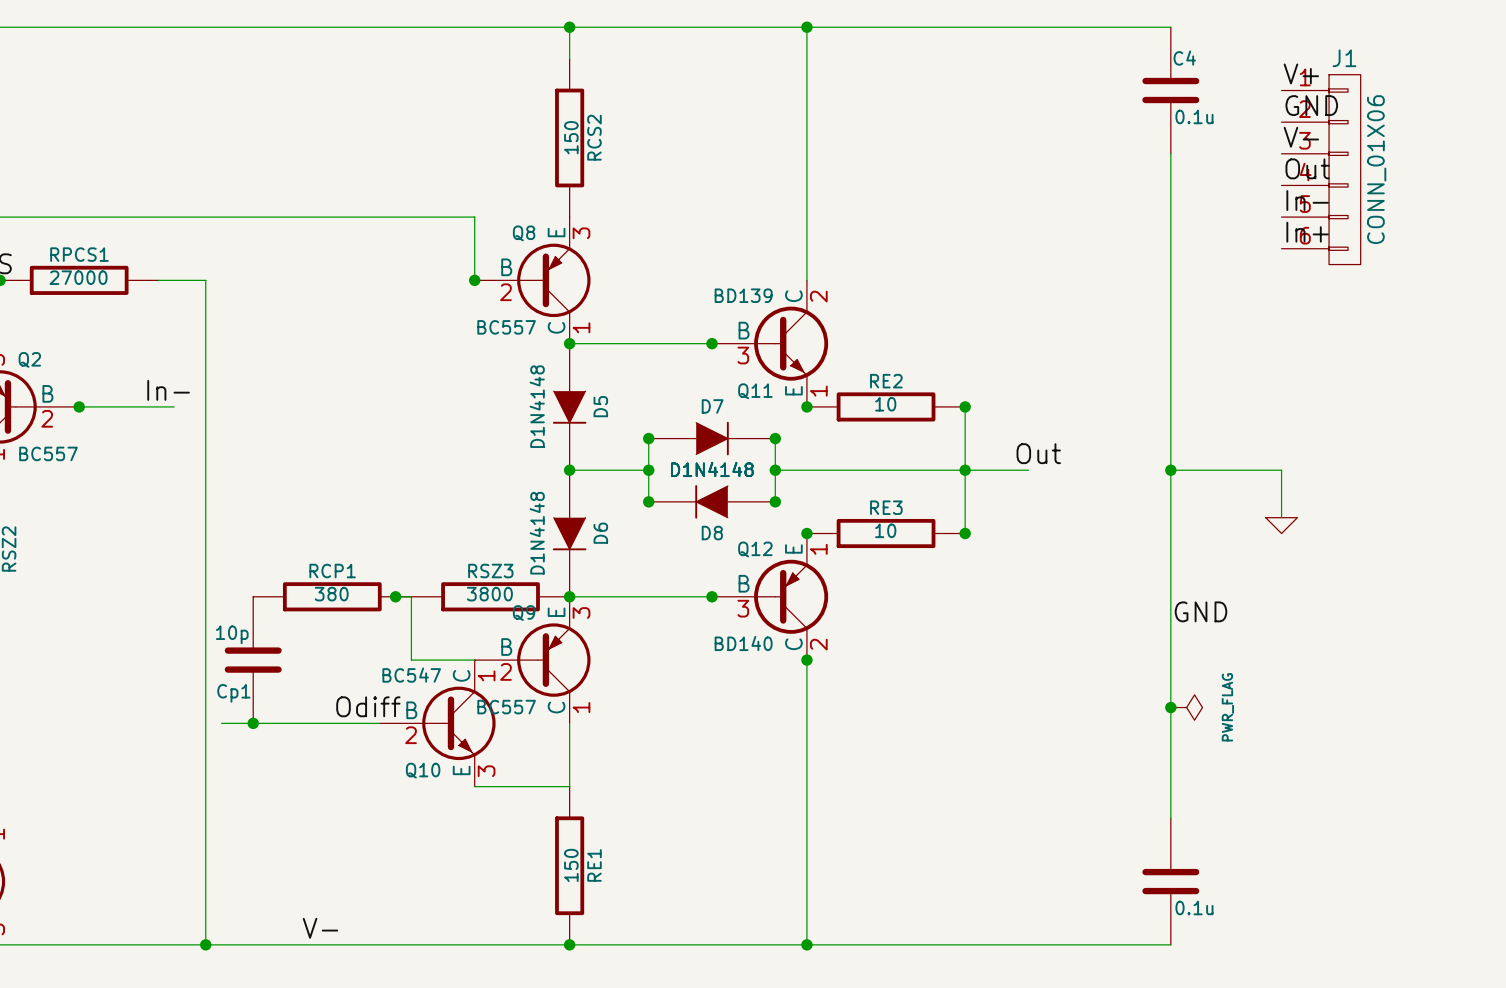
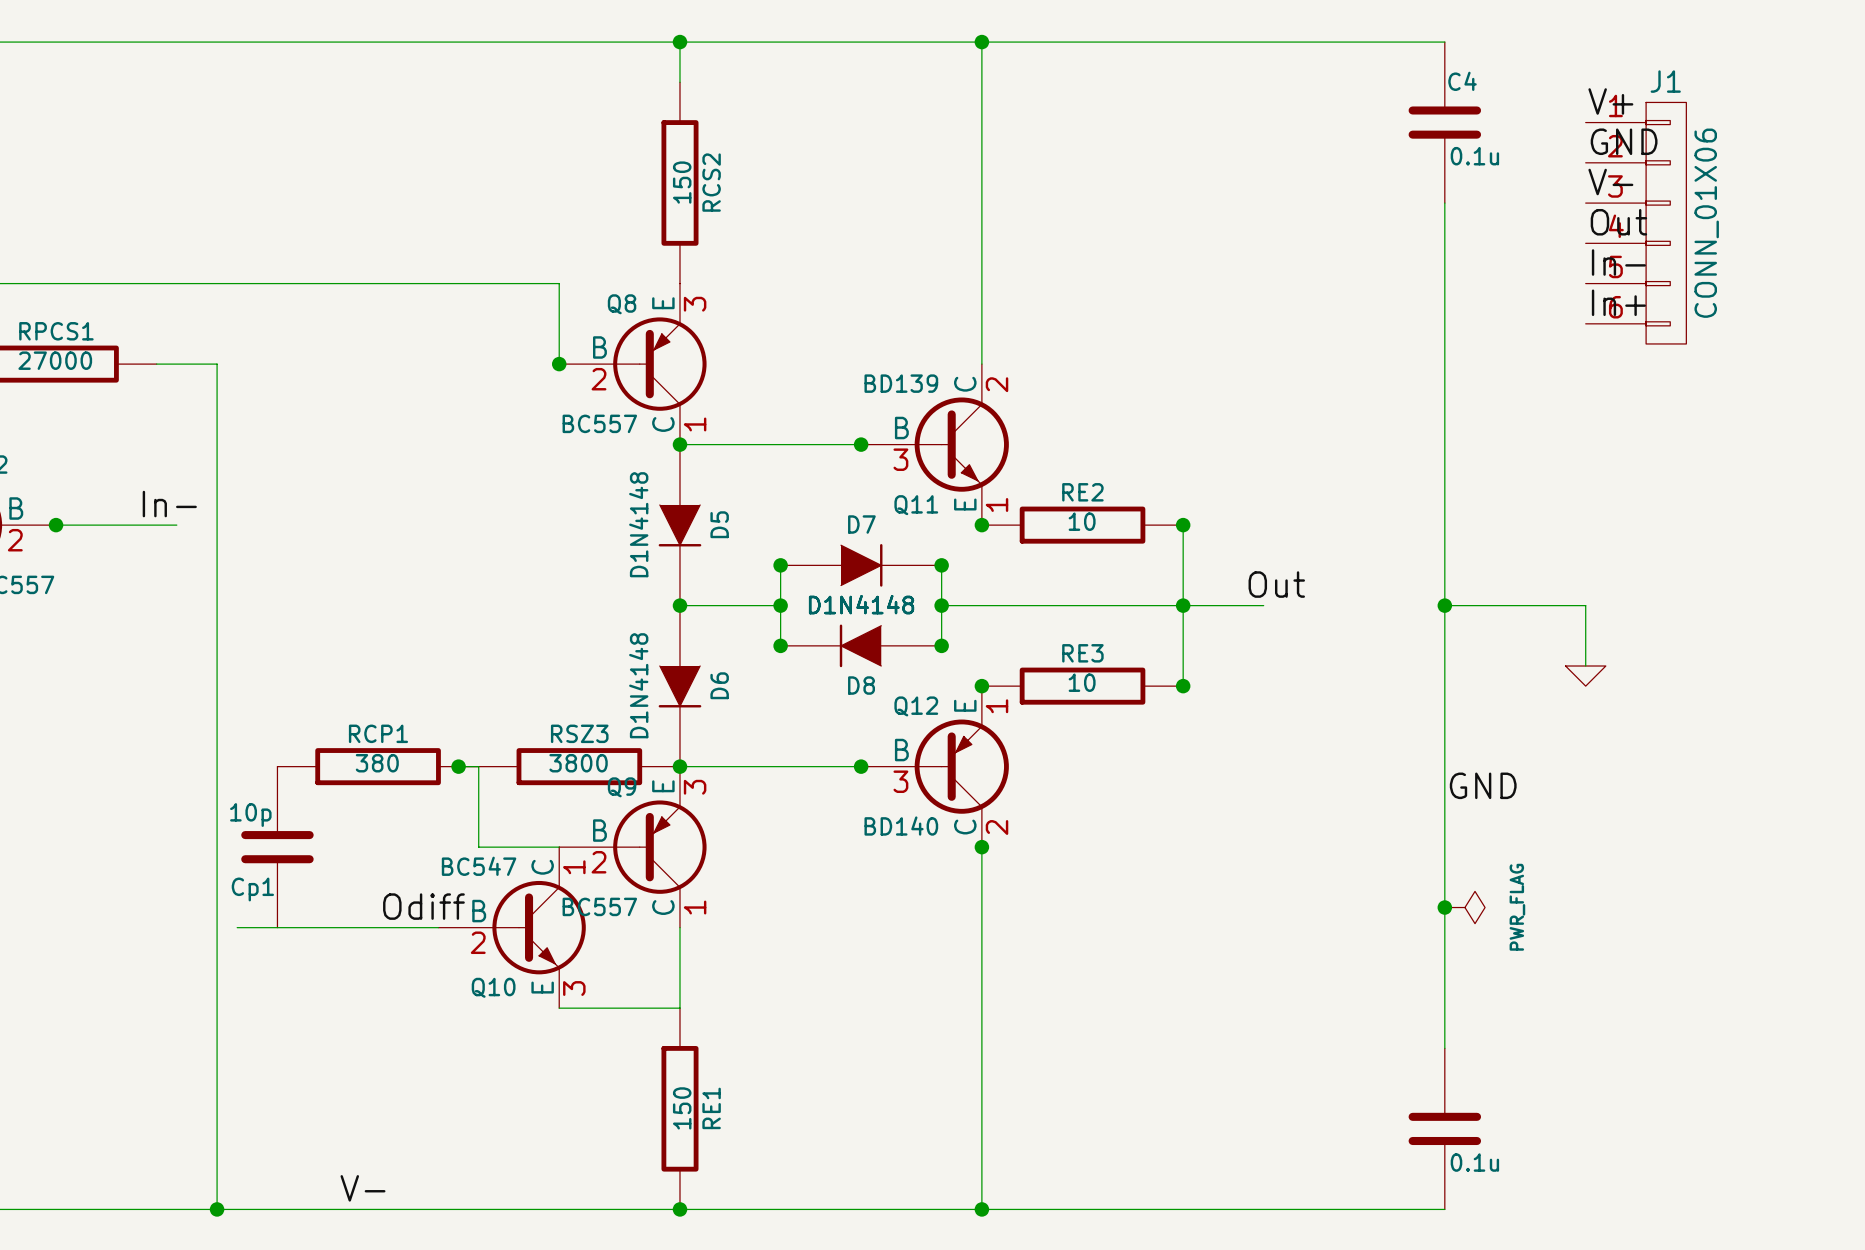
junction: (253, 723) -> none

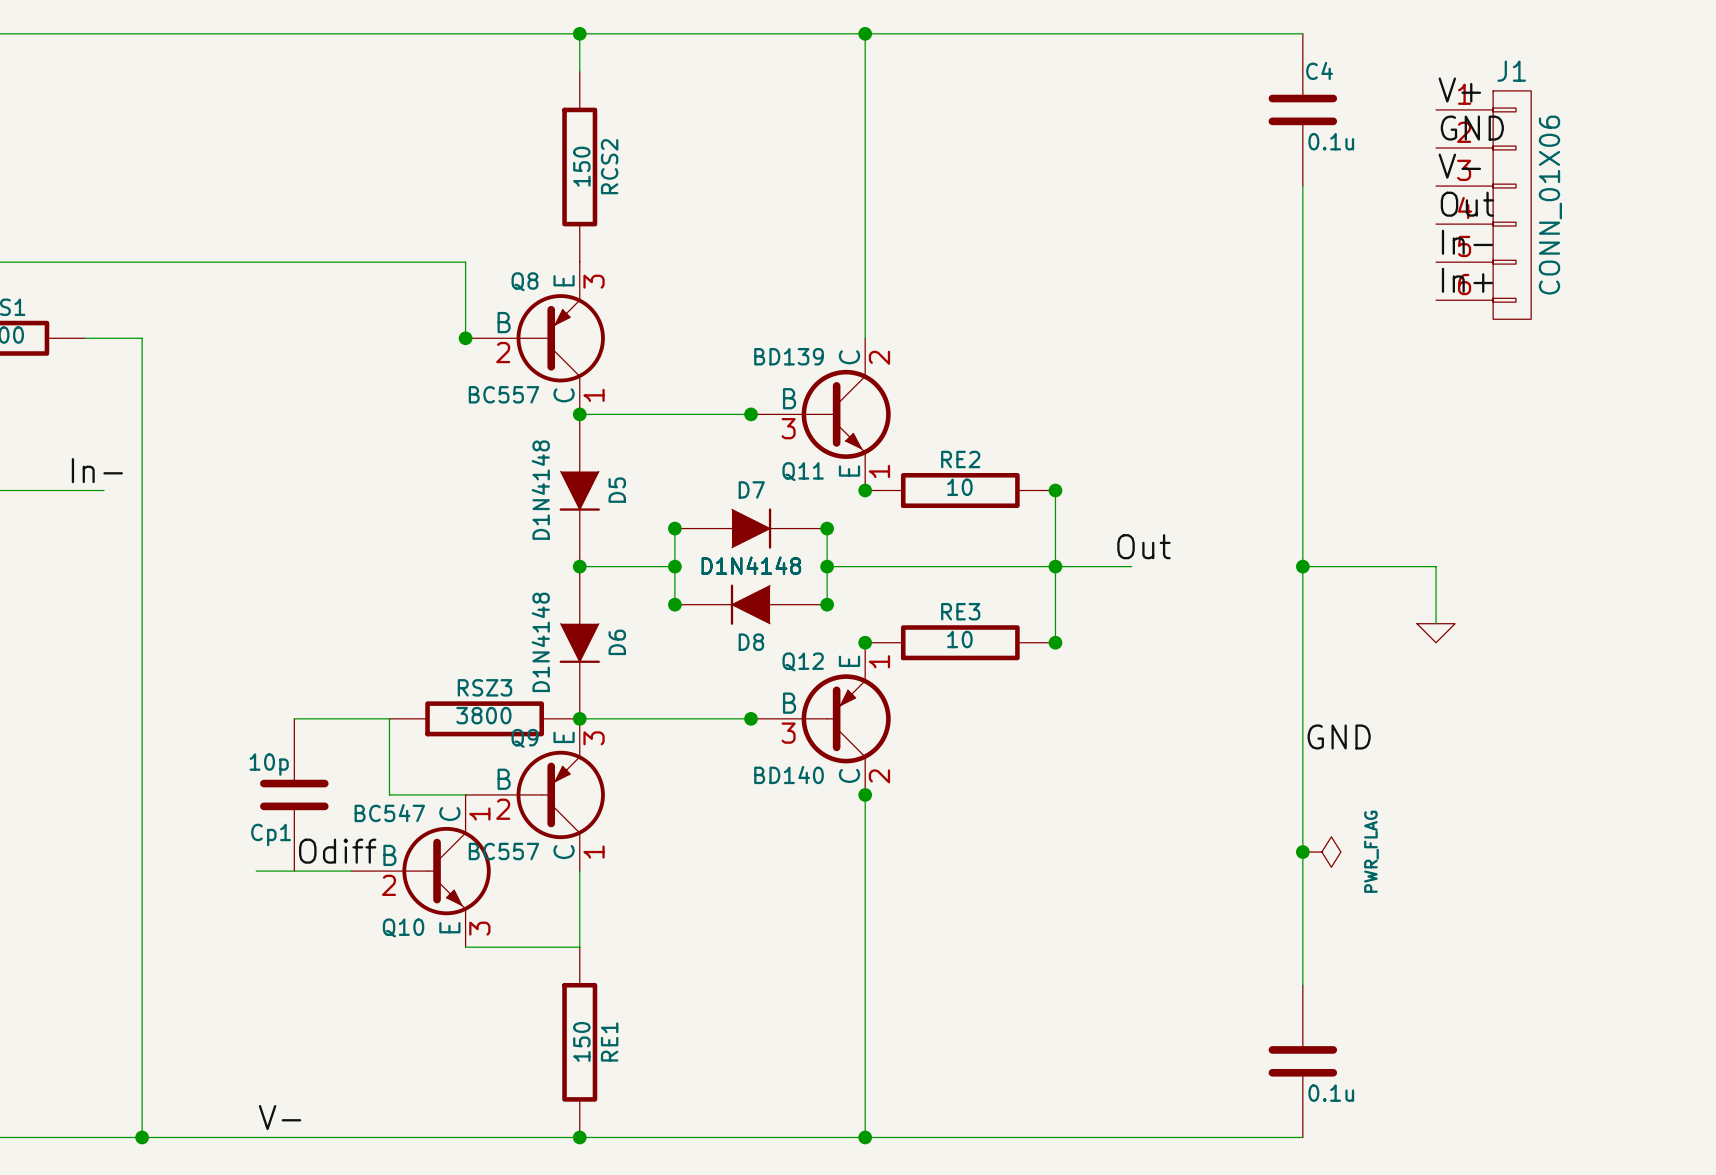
wire: none -> (294, 718) (370, 718)
RCP1: 380 (378, 766) -> none
junction: (458, 766) -> none
Cp1 position: (277, 847) -> (294, 794)
wire: (237, 927) (337, 927) -> none

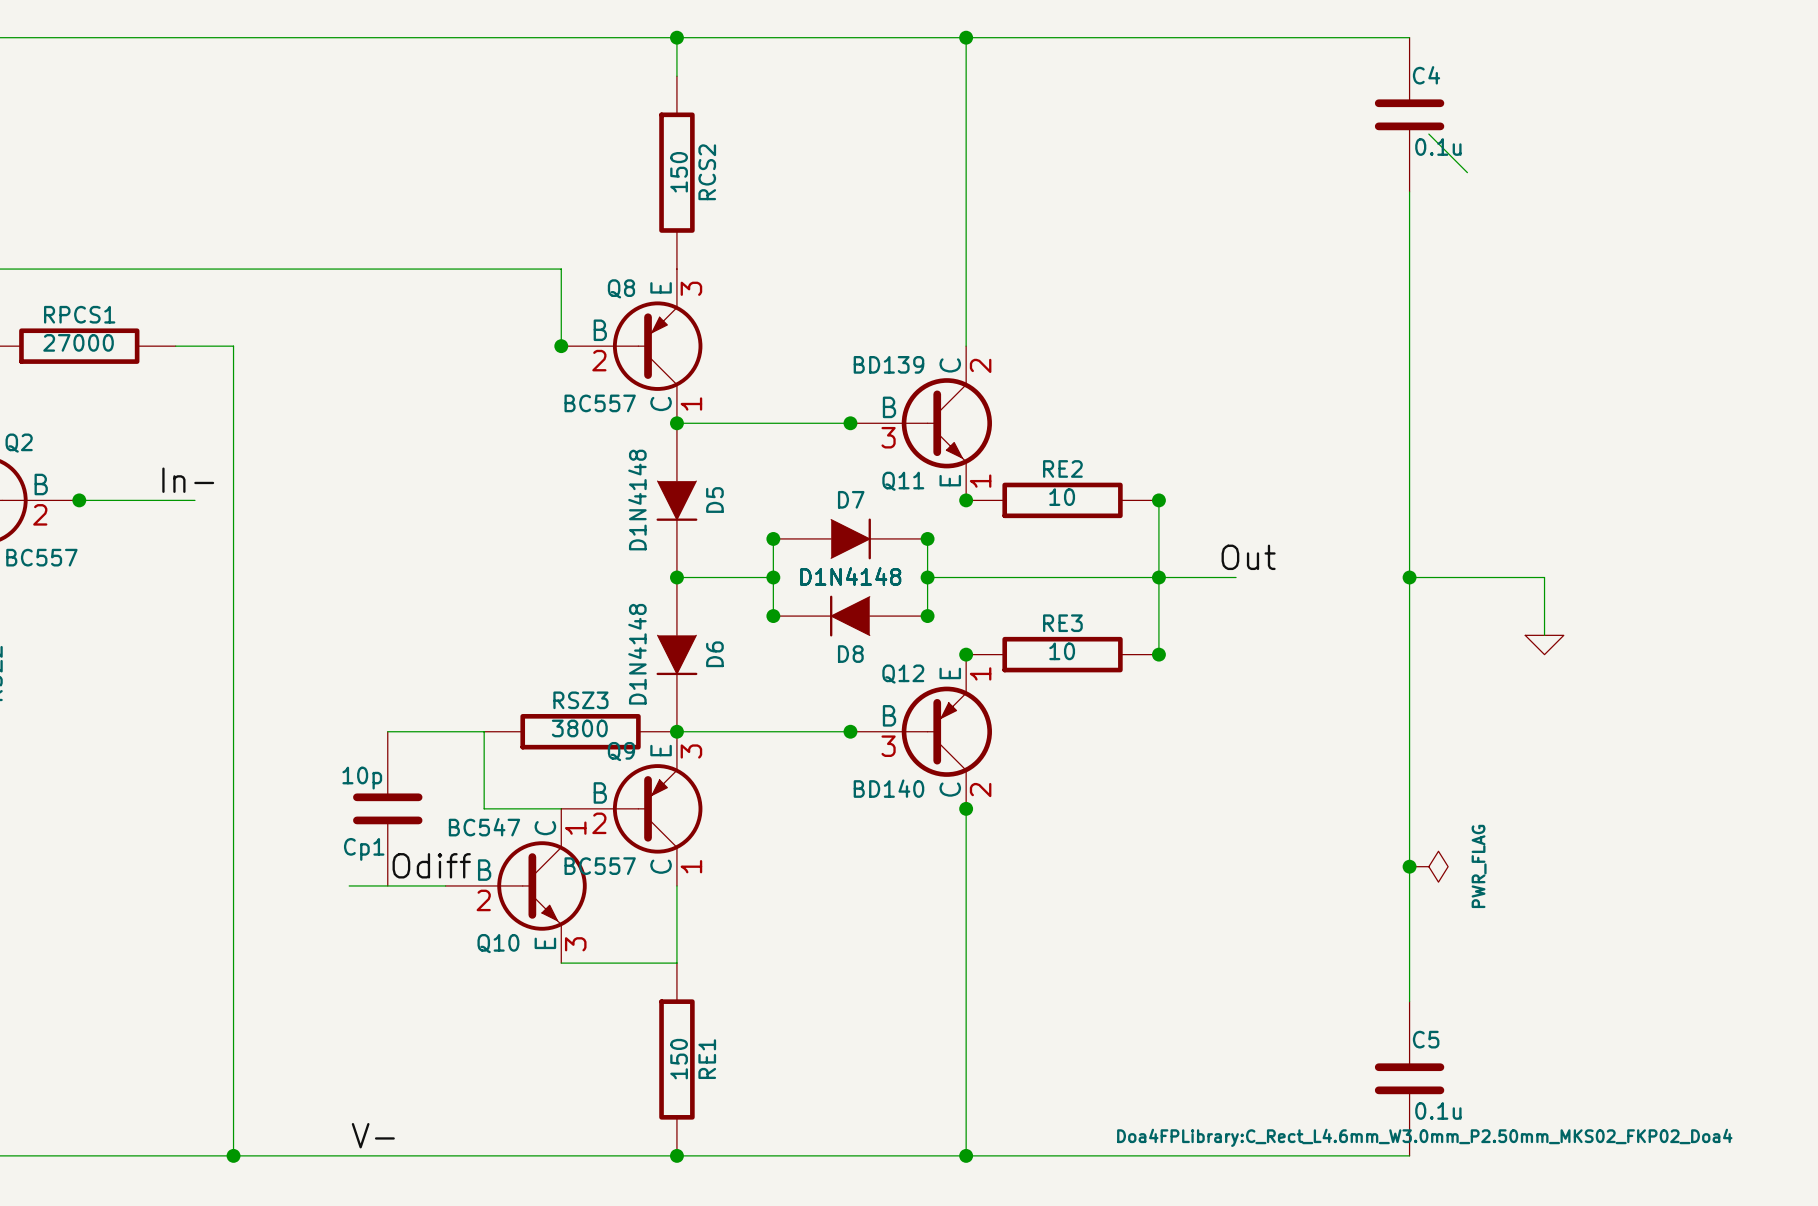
label: V+ (1459, 90) -> none
wire: none -> (1428, 134) (1467, 172)
label: GND (1472, 128) -> none
label: V- (1459, 166) -> none
label: Out (1467, 204) -> none
J1: CONN_01X06 (1483, 205) -> none
label: In- (1467, 242) -> none
label: In+ (1467, 280) -> none
label: GND (1339, 736) -> none
C5 name: none -> C5 (1426, 1039)
C5 text: none -> Doa4FPLibrary:C_Rect_L4.6mm_W3.0mm_P2.50mm_MKS02_FKP02_Doa4 (1424, 1137)

